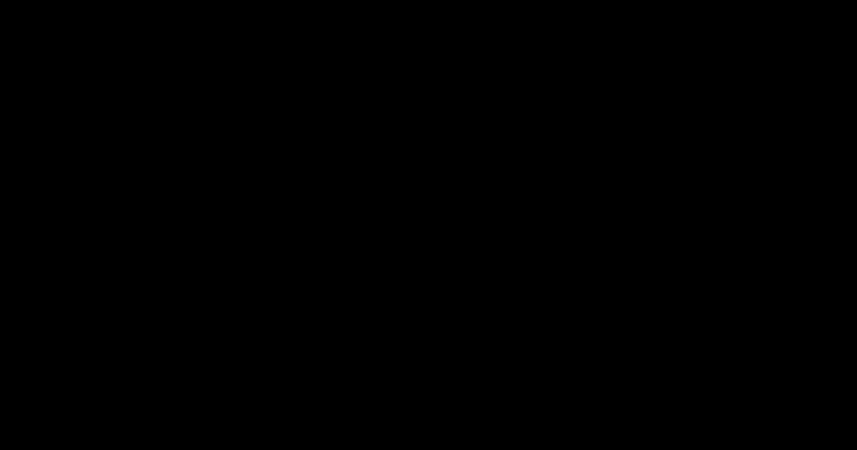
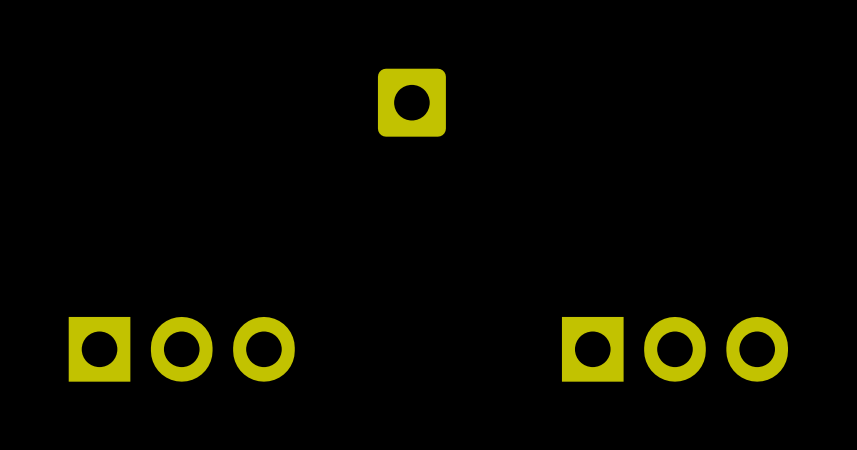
part: none -> (411, 102)
part: none -> (181, 349)
part: none -> (674, 349)

